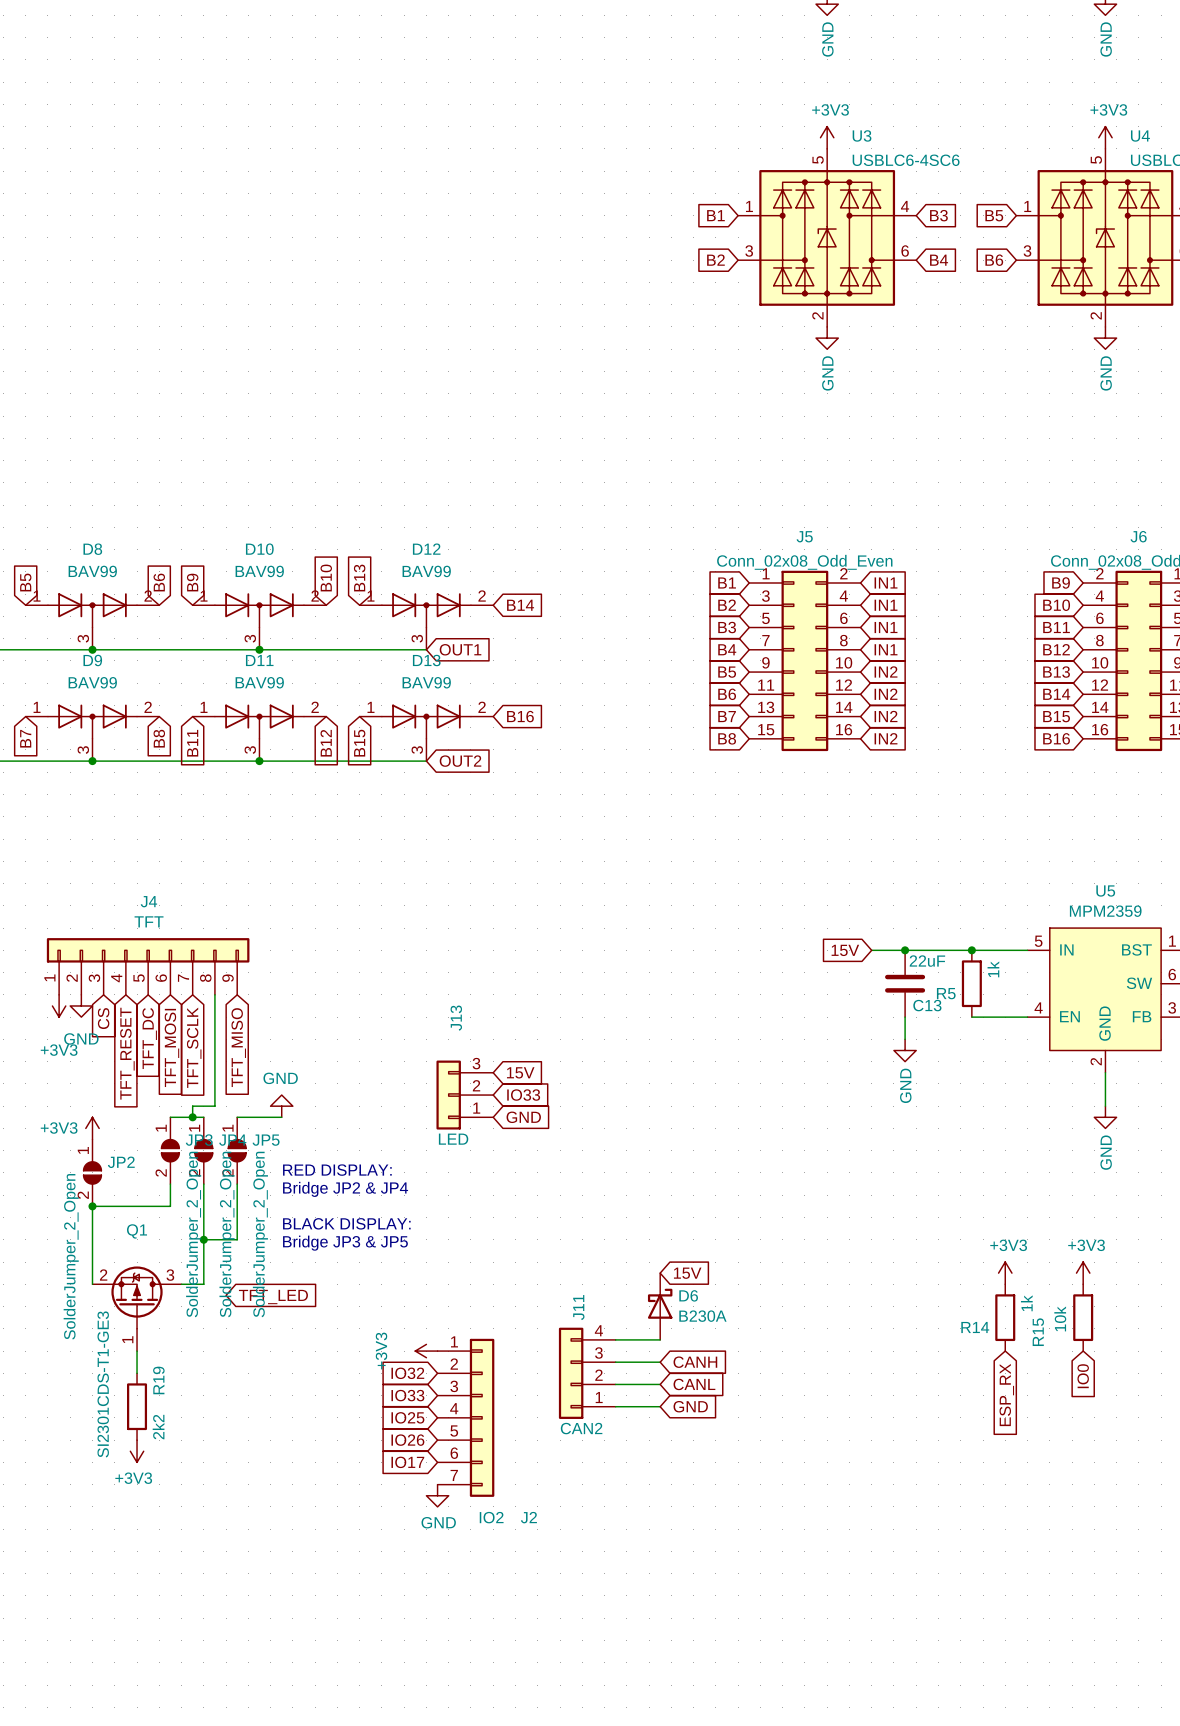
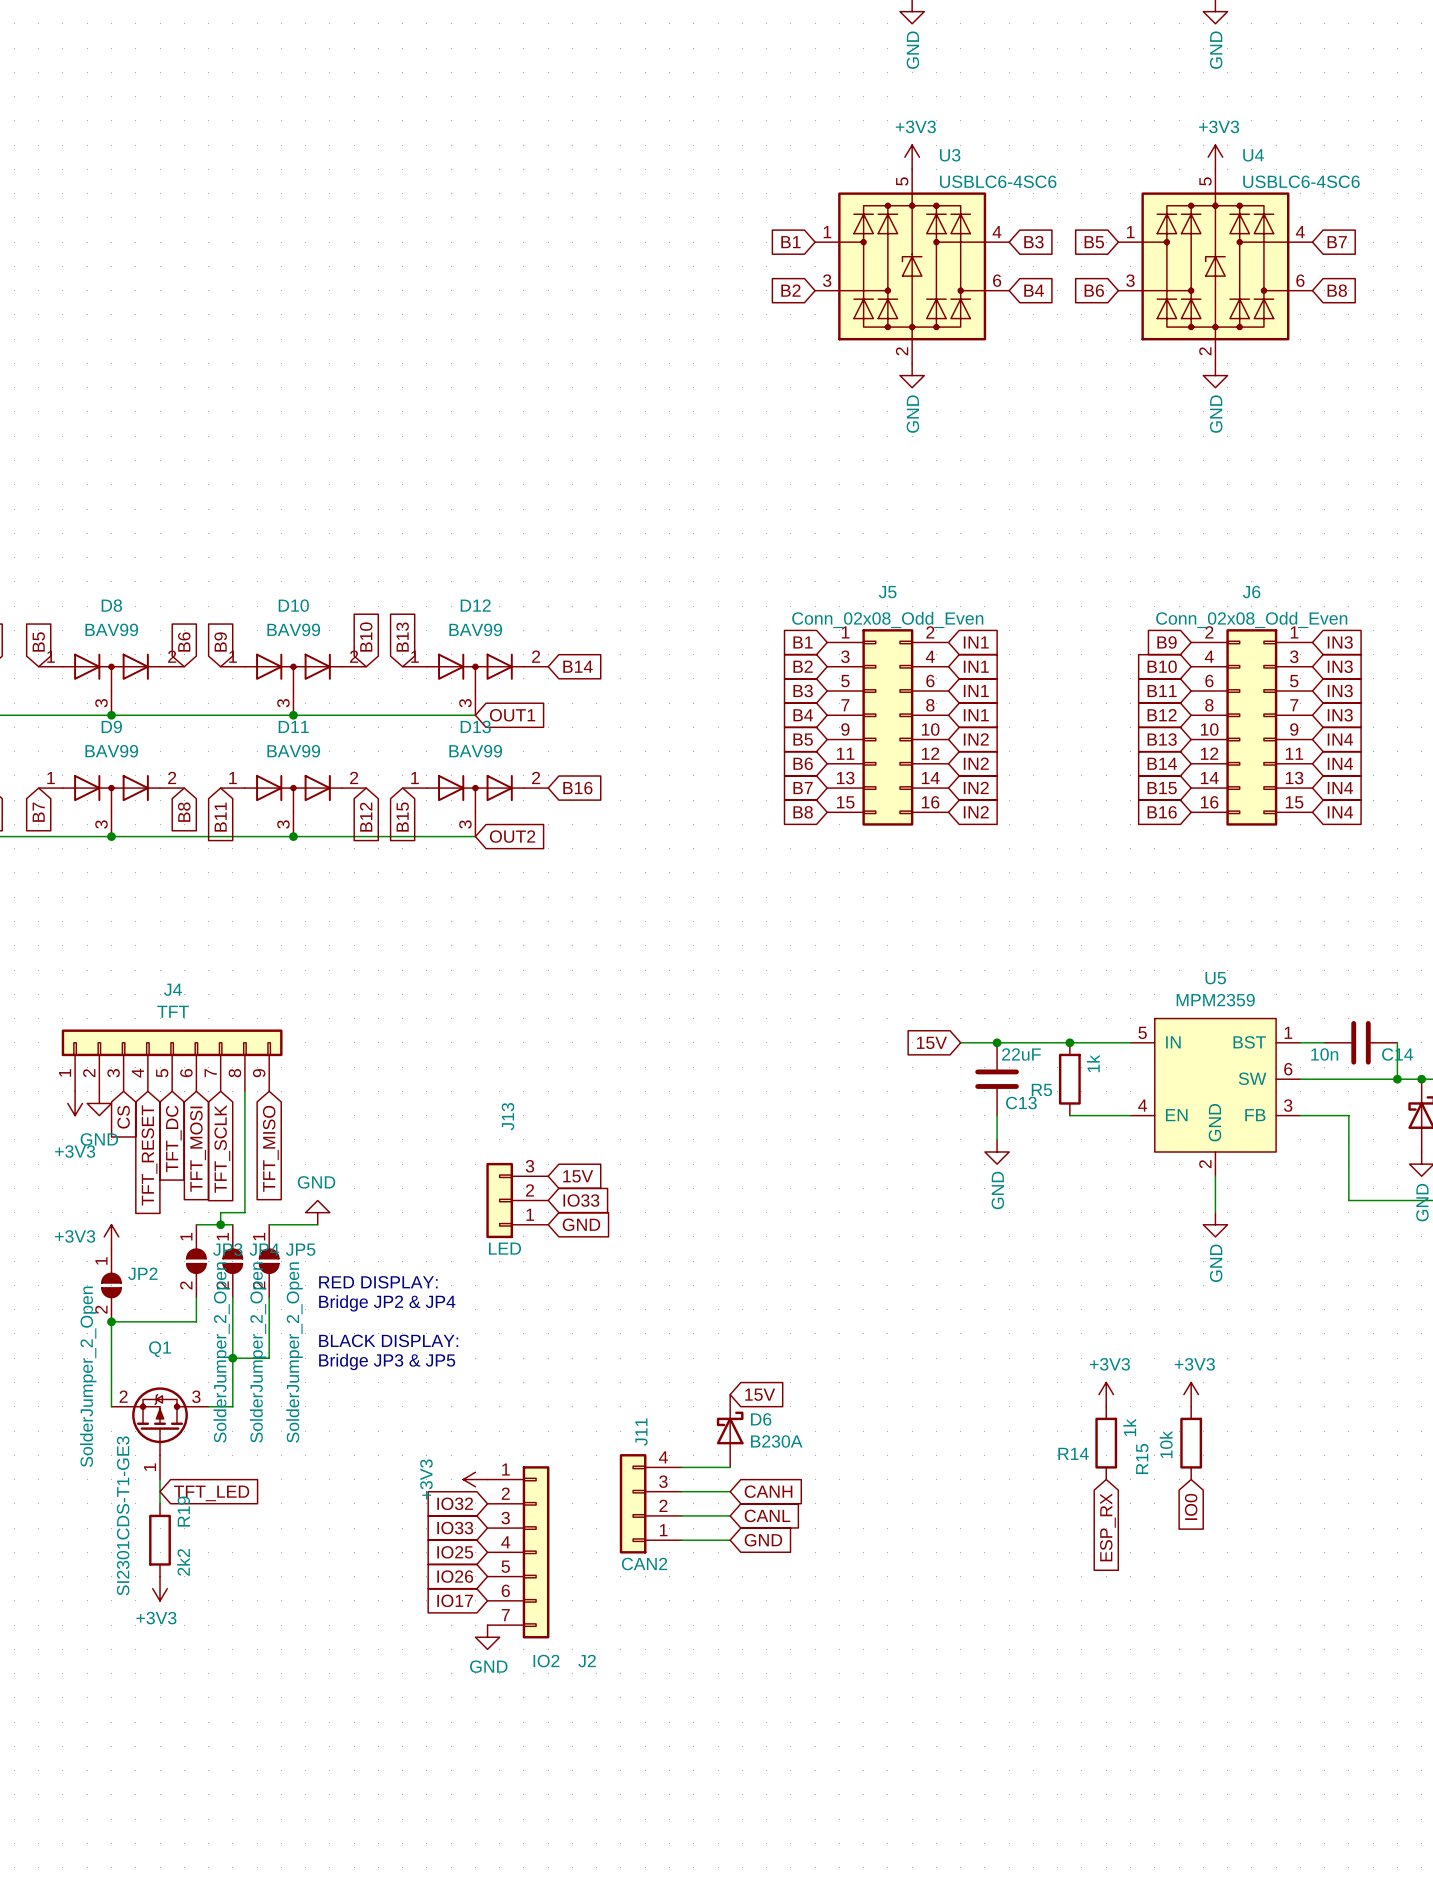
global label position: TFT_LED (273, 1297) -> TFT_LED (211, 1493)

